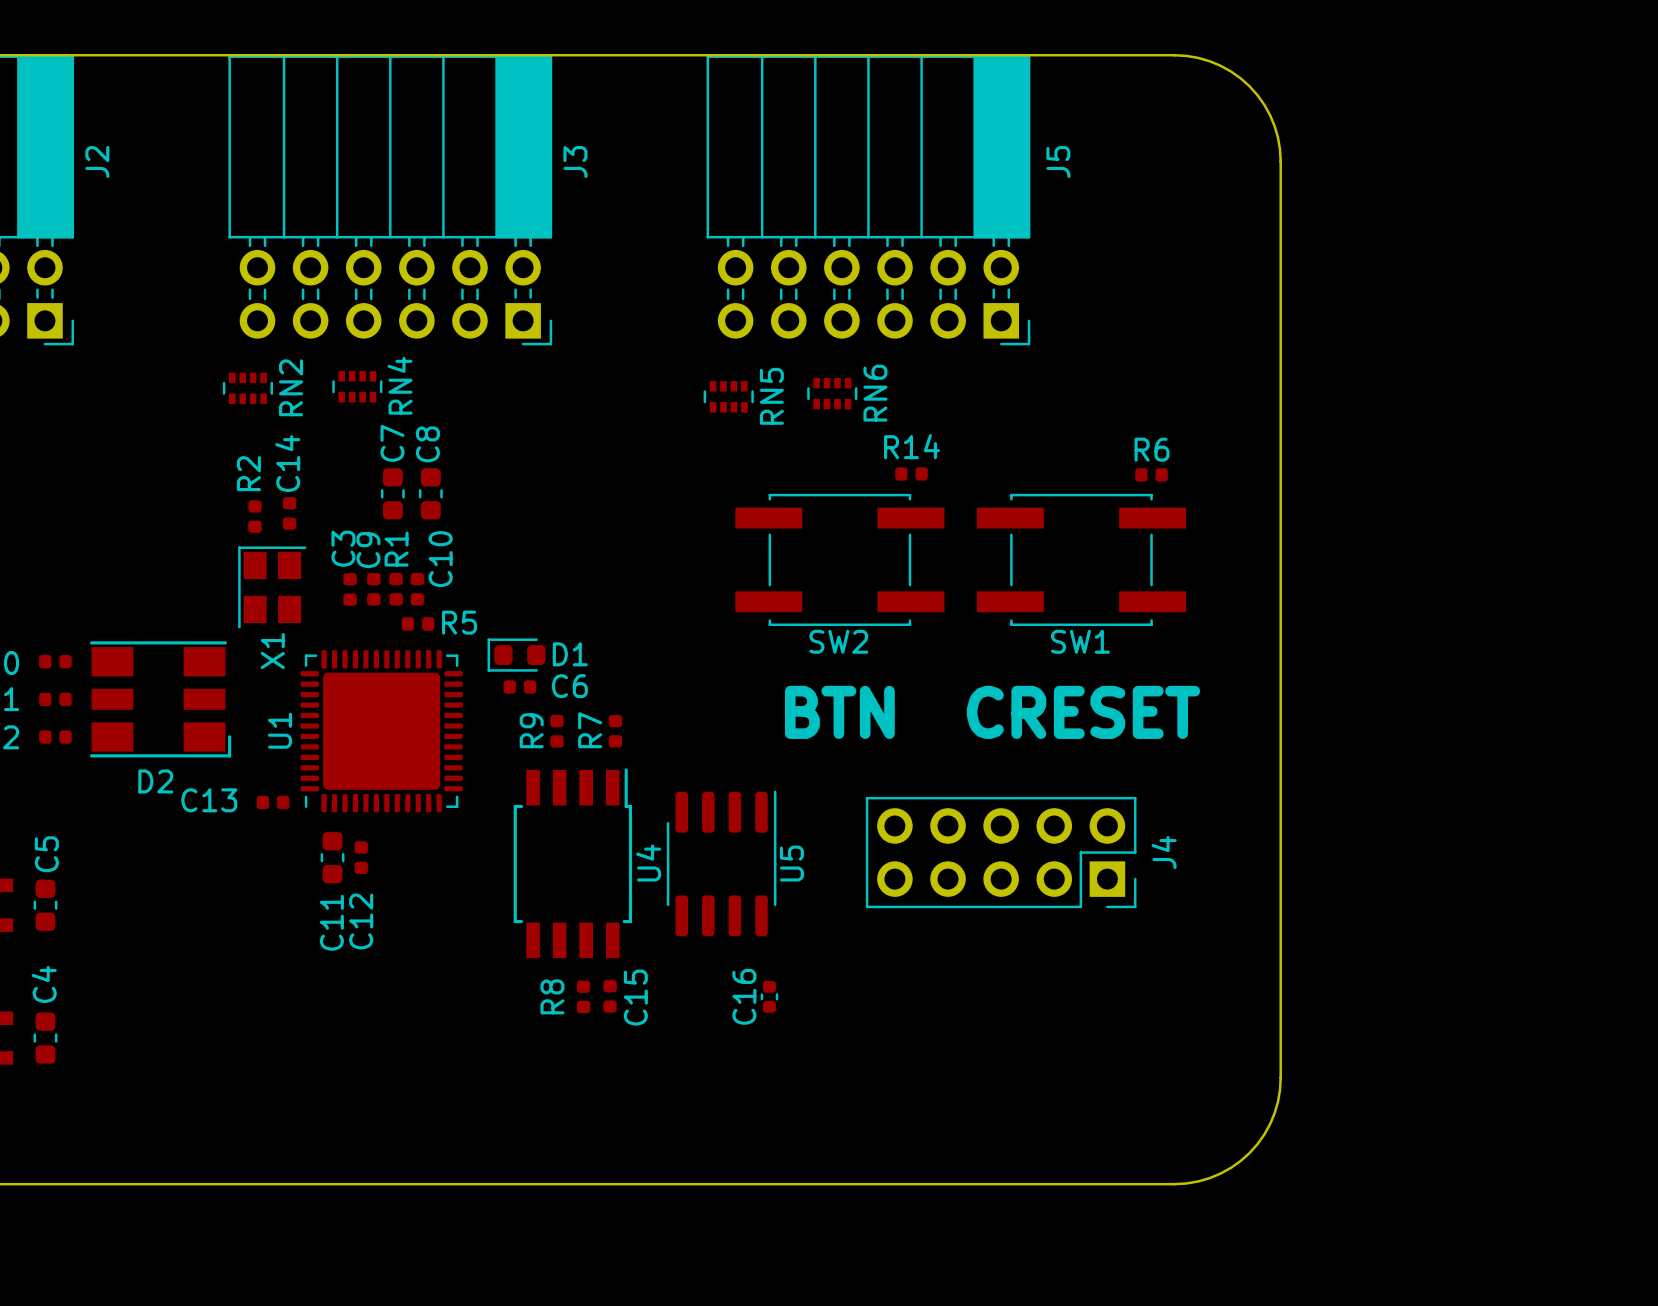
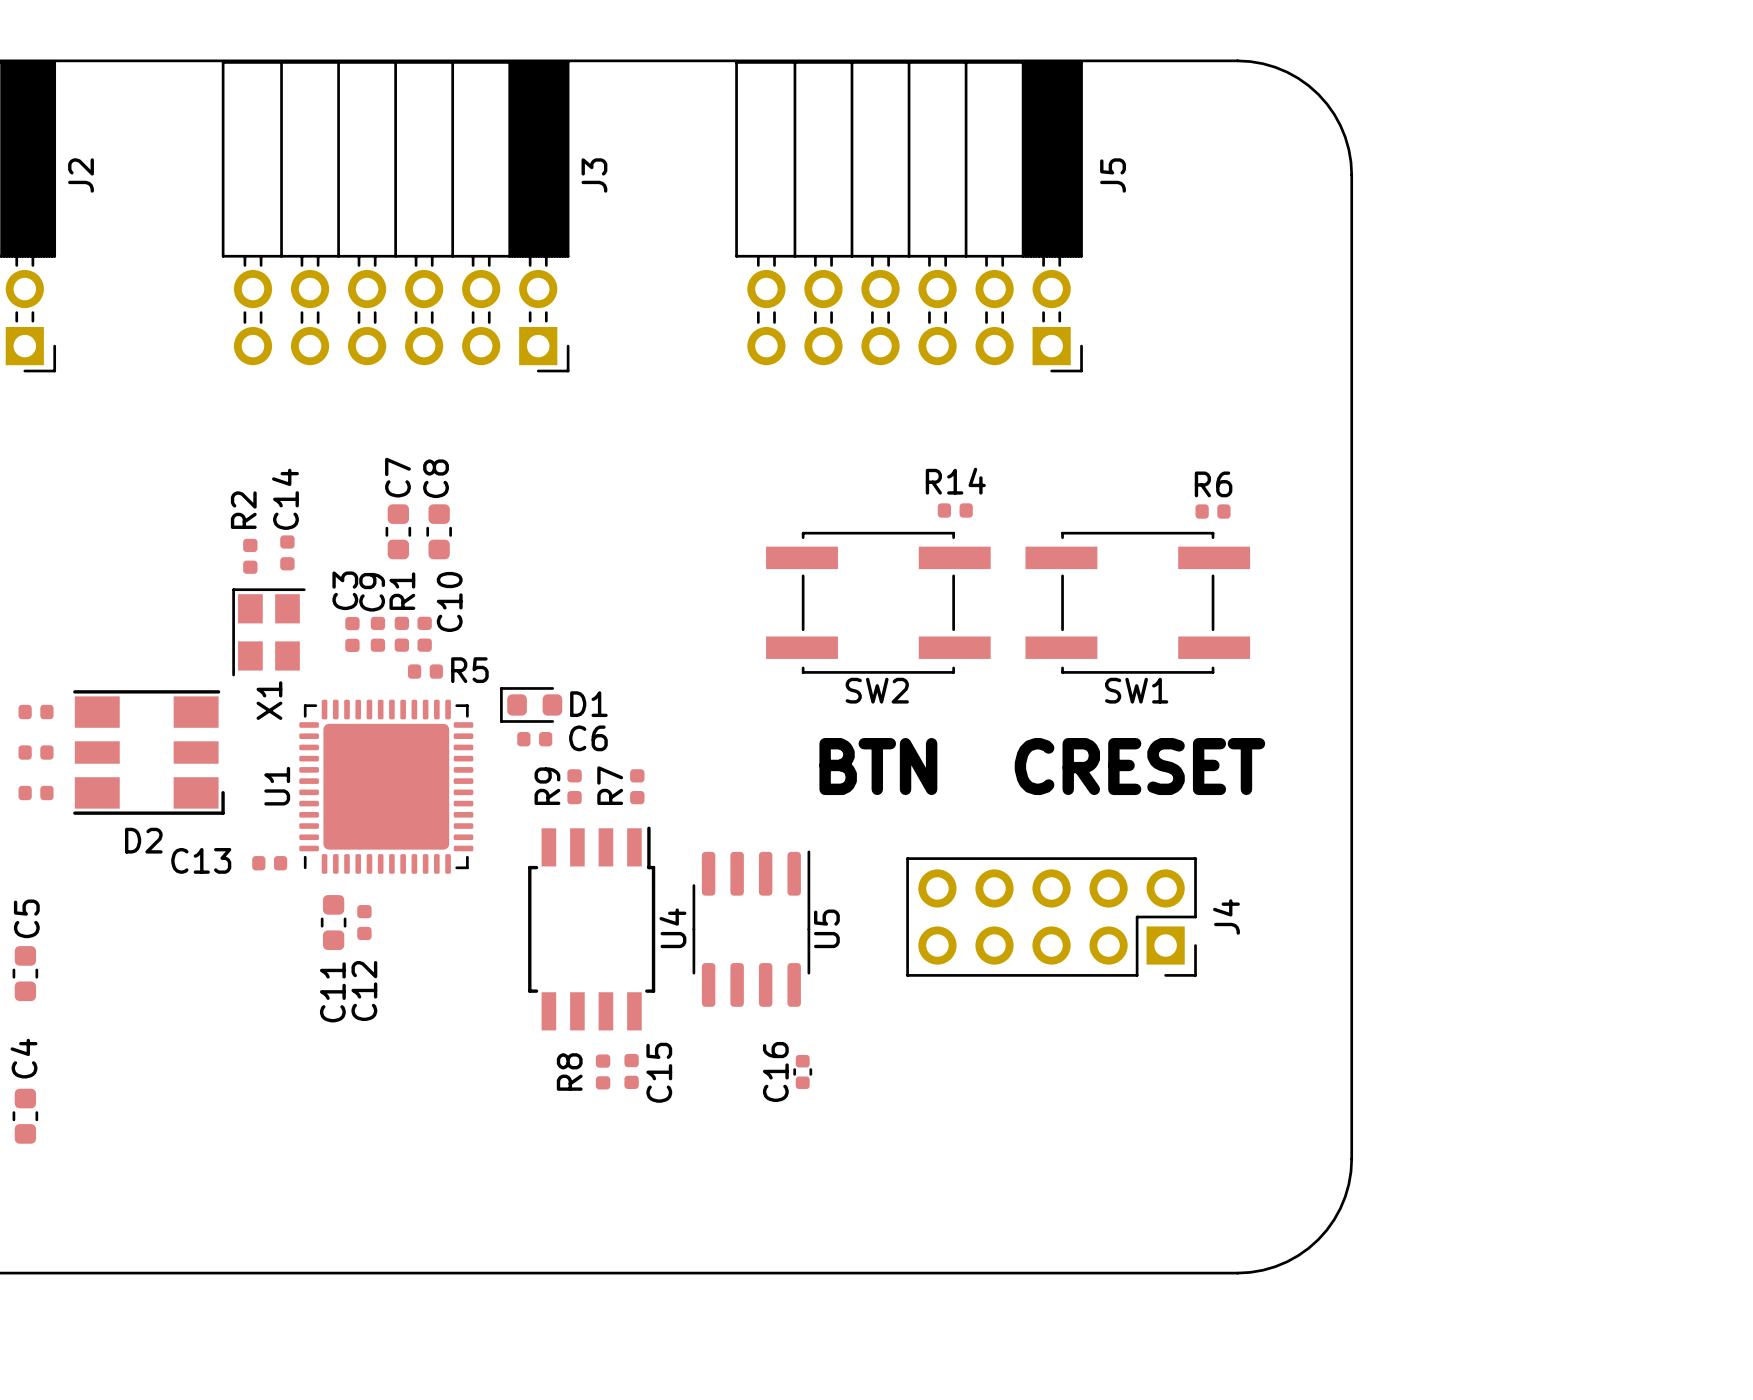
RN4: (357, 386) -> none
RN2: (247, 388) -> none
RN6: (832, 393) -> none
RN5: (728, 396) -> none

